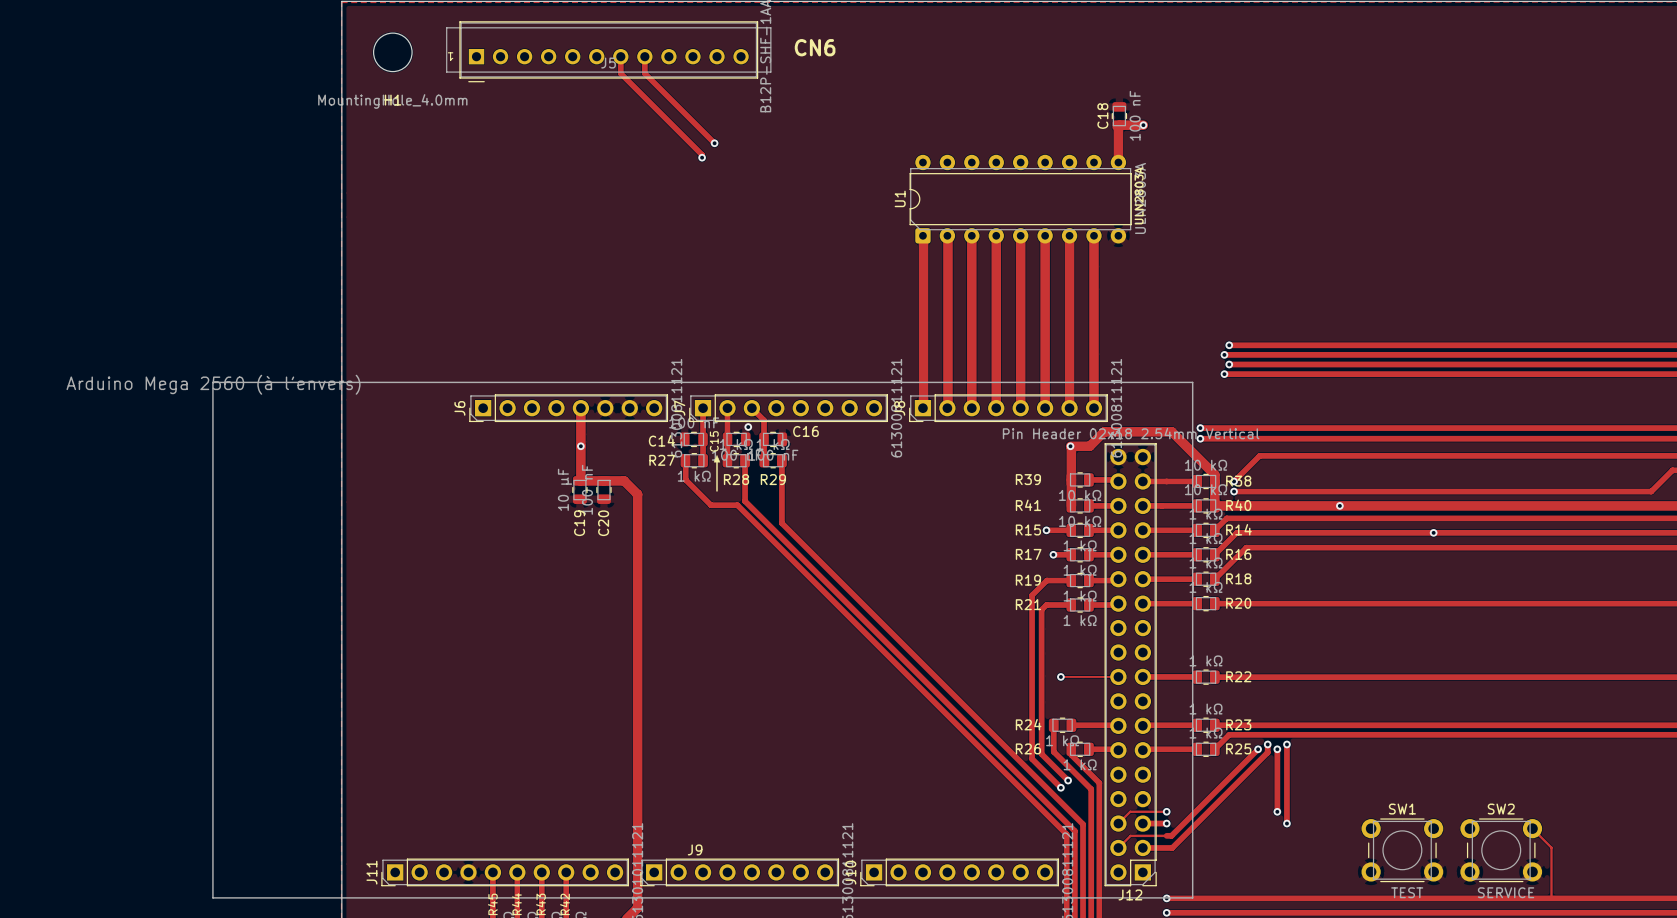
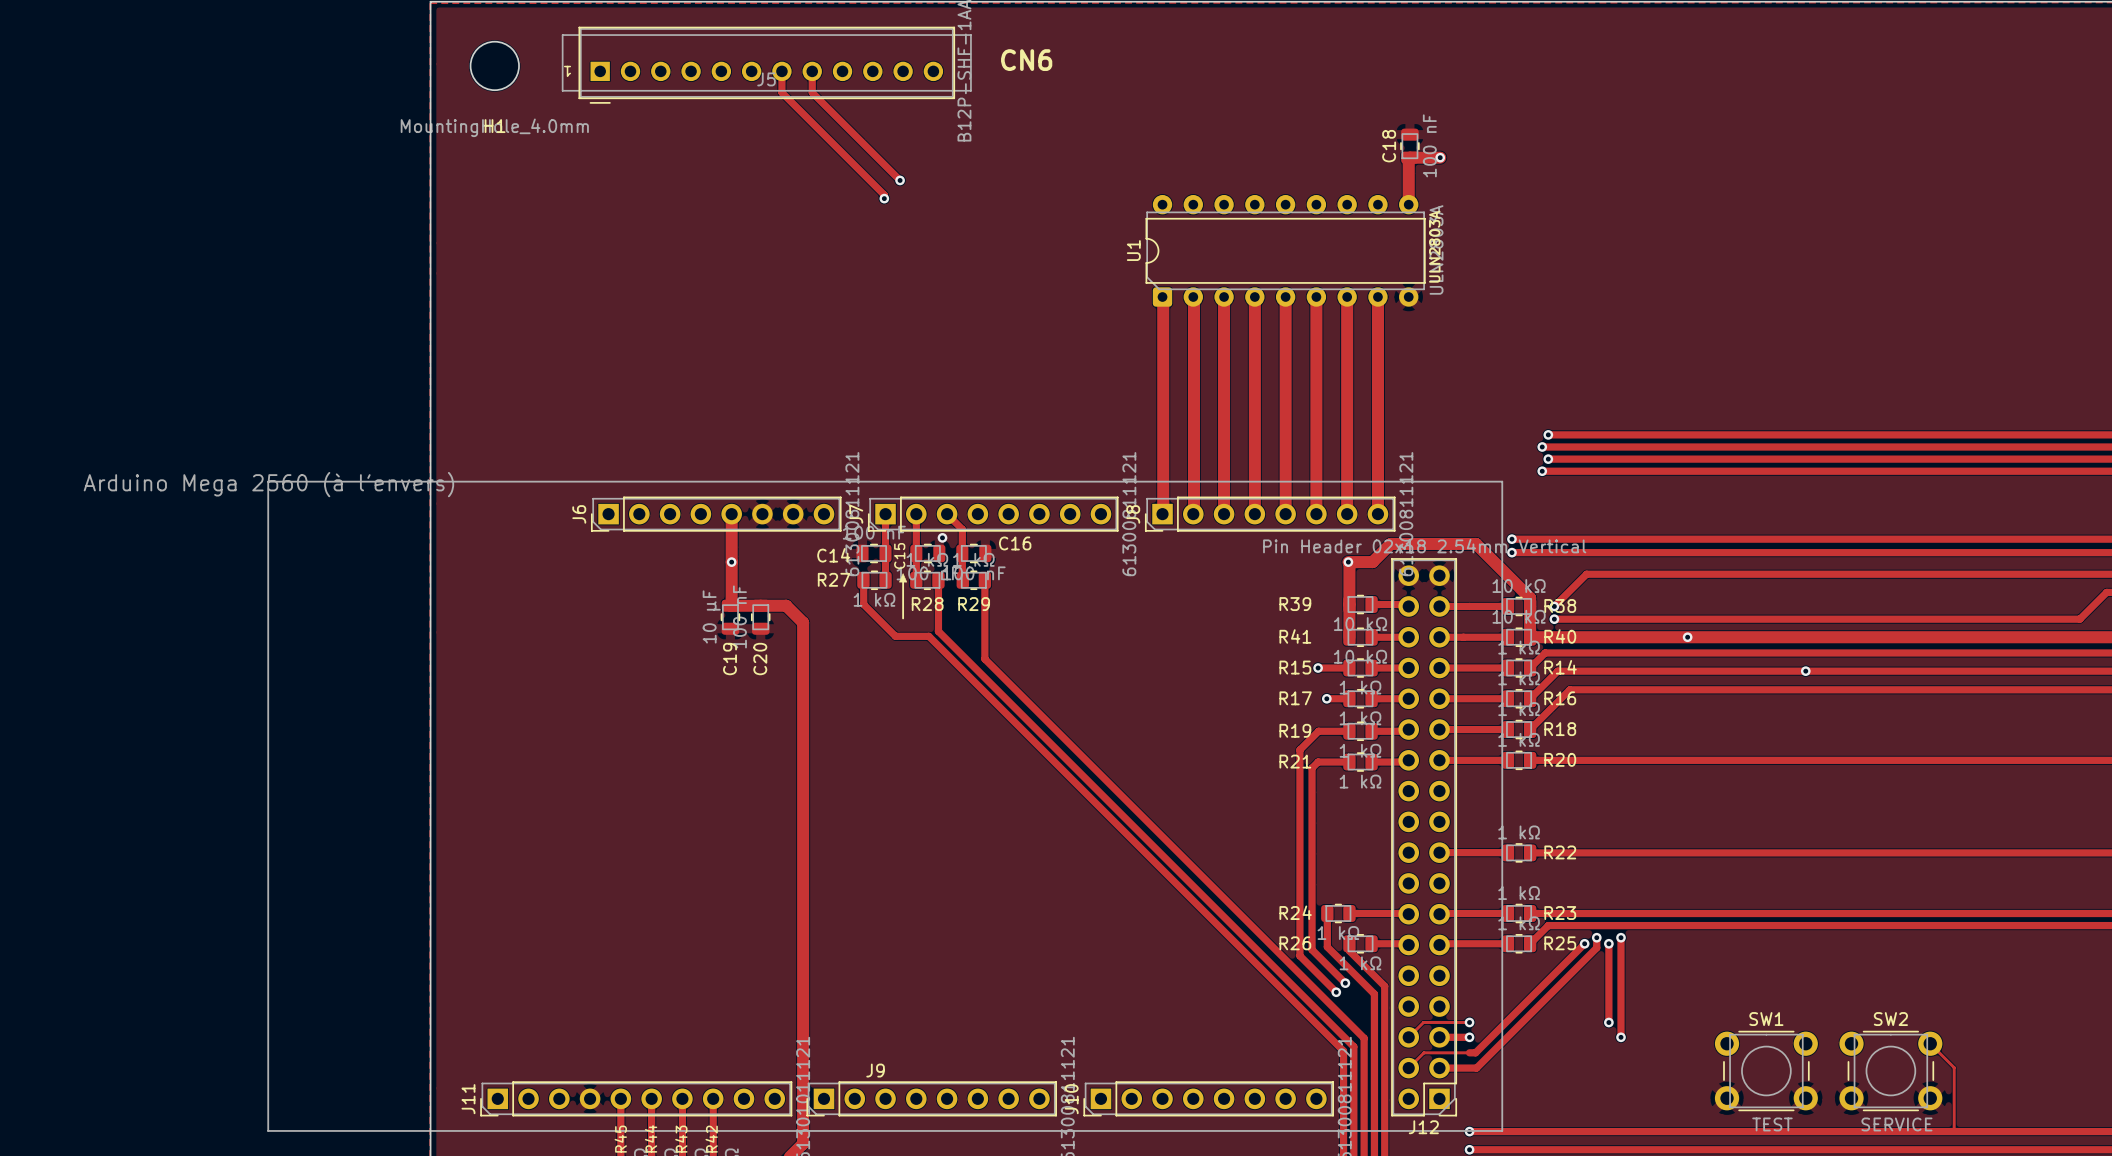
track: (1060, 676) (1118, 676) -> none
via: (1060, 676) -> none

